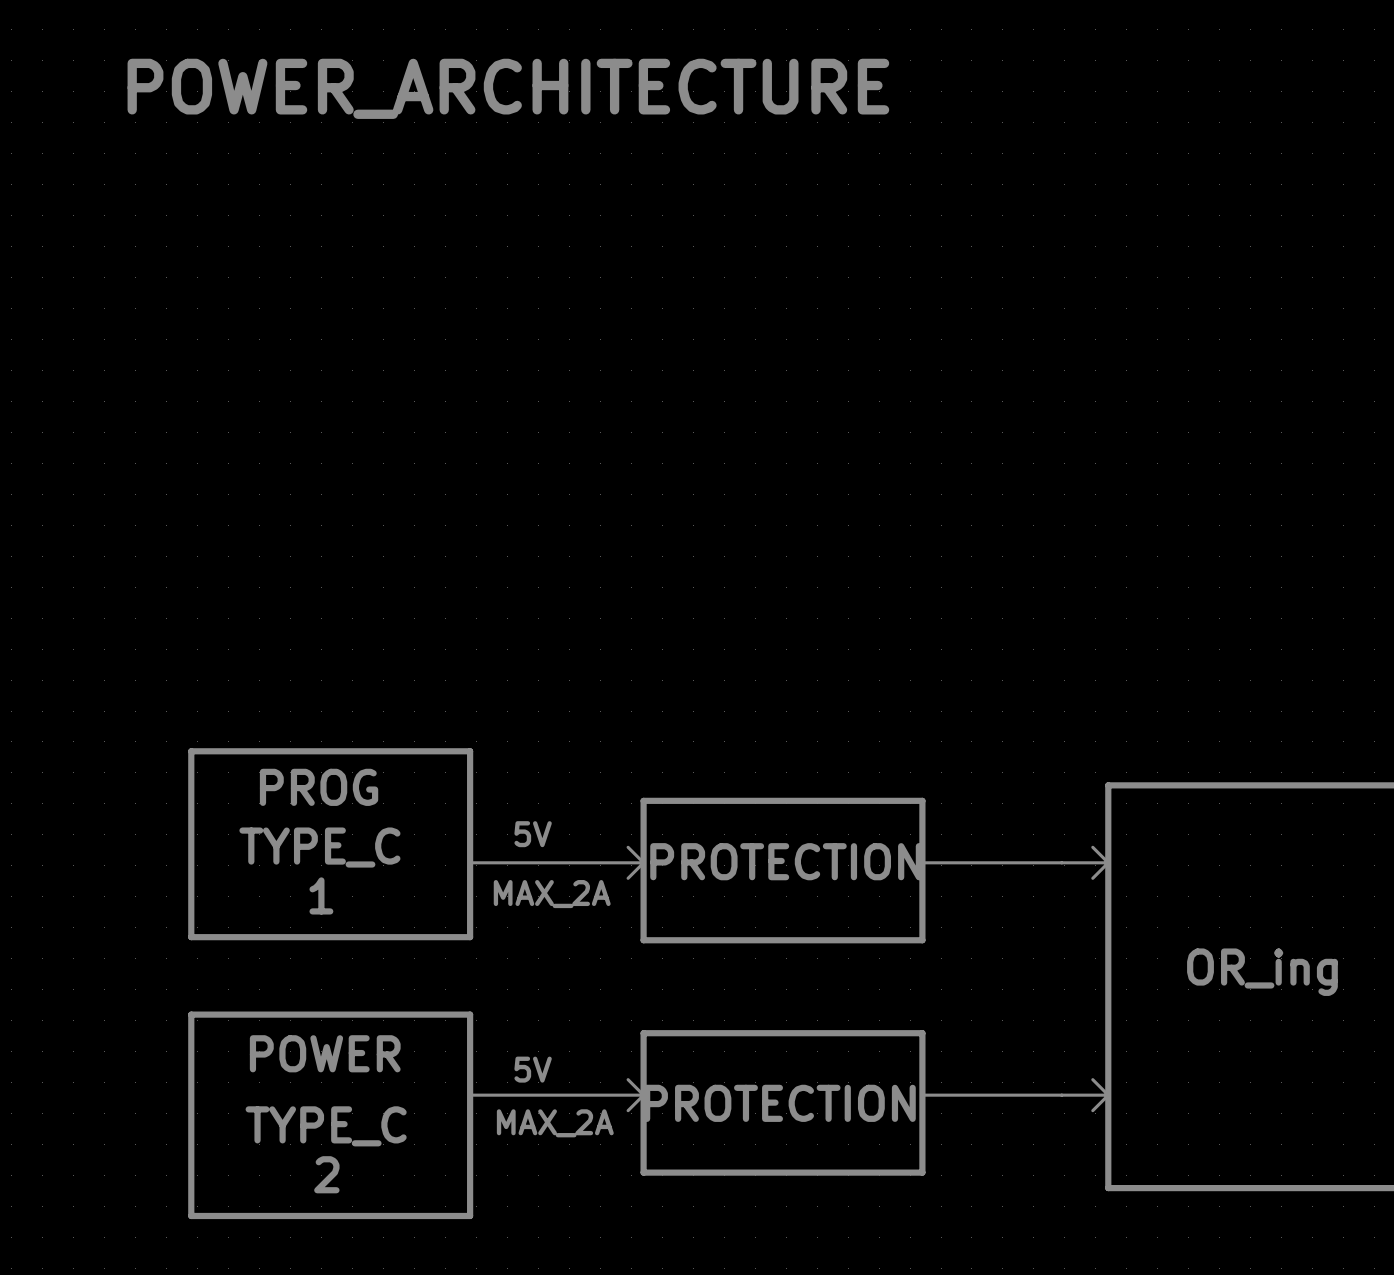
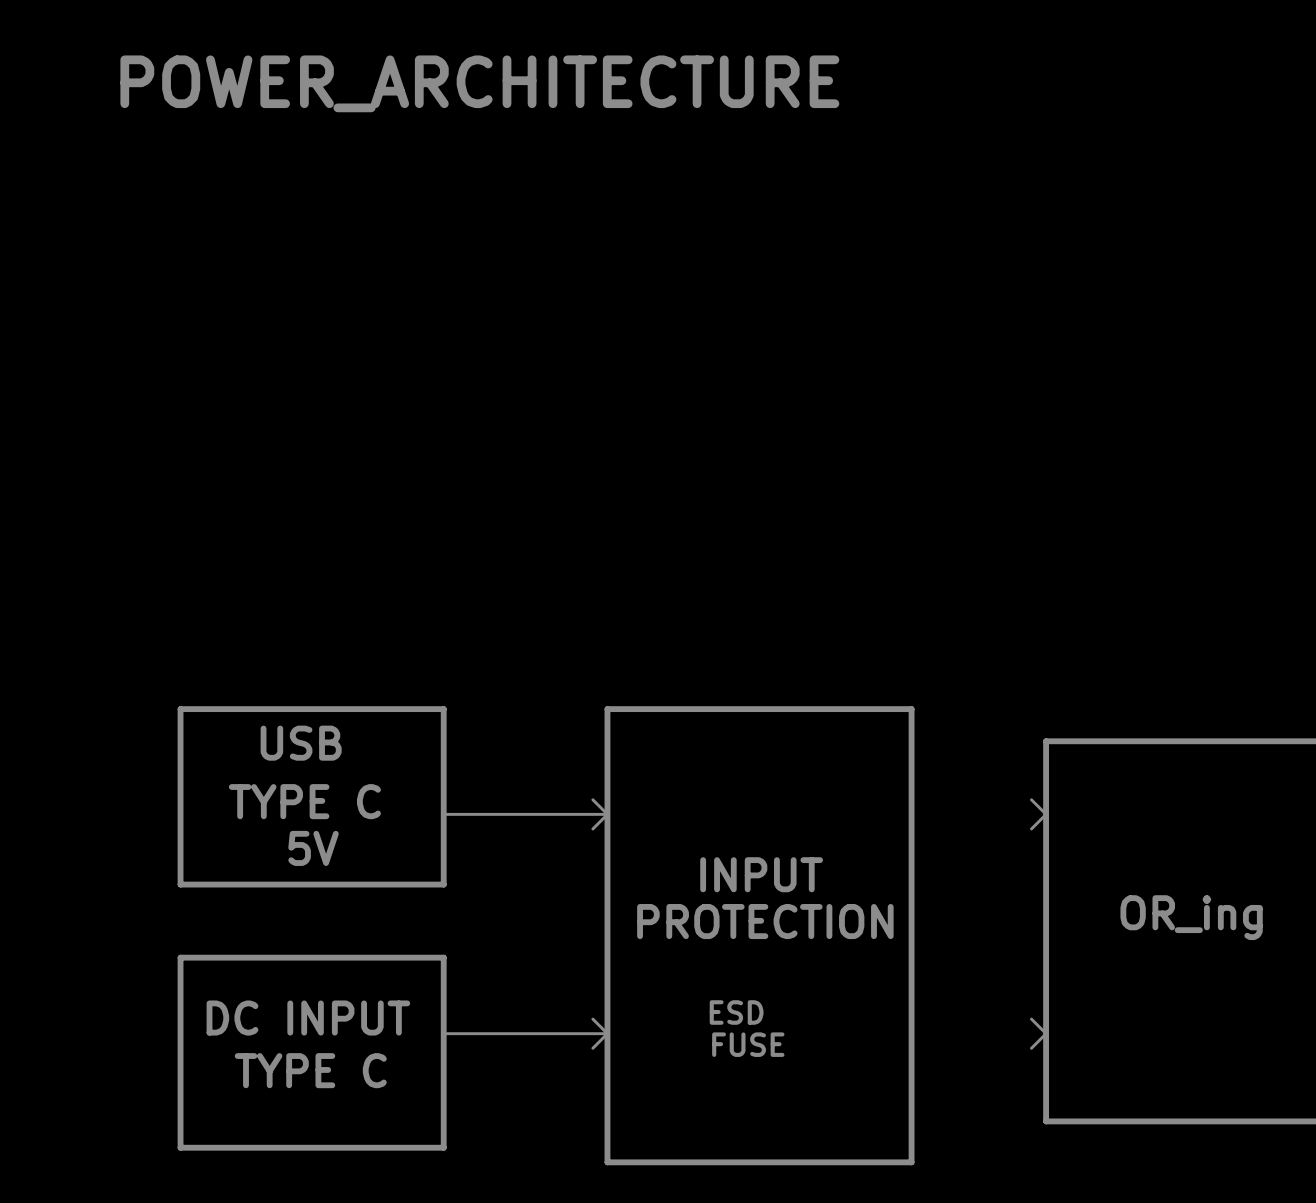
text: PROG (319, 787) -> USB (301, 743)
line: (643, 800) (922, 800) (922, 940) (643, 940) -> (607, 755) (607, 709) (911, 709) (911, 1162) (607, 1162) (607, 1106)
text: 5V (533, 834) -> none
text: TYPE_C (319, 847) -> TYPE C (304, 801)
text: PROTECTION (786, 861) -> none
line: (922, 862) (1108, 862) -> none
text: MAX_2A (552, 894) -> none
text: 1 (321, 895) -> 5V (313, 848)
text: none -> INPUT (761, 874)
text: none -> PROTECTION (765, 921)
line: (643, 1033) (922, 1033) (922, 1172) (643, 1172) -> (607, 975) (607, 887)
text: POWER (325, 1053) -> none
text: 5V (533, 1069) -> none
text: none -> ESD (736, 1012)
text: none -> DC INPUT (308, 1018)
line: (922, 1095) (1108, 1095) -> none
text: PROTECTION (779, 1103) -> none
text: none -> FUSE (748, 1044)
text: MAX_2A (555, 1123) -> none
text: TYPE_C (326, 1126) -> TYPE C (310, 1070)
text: 2 (326, 1174) -> none

